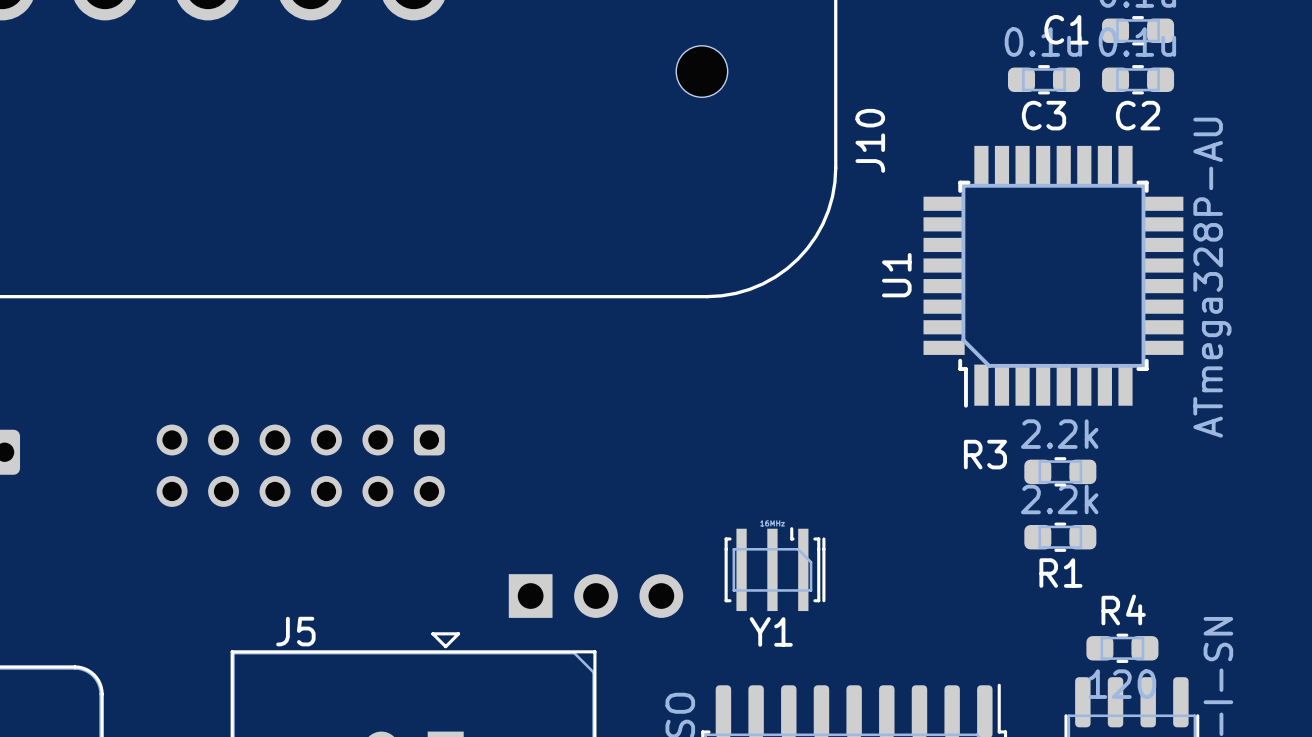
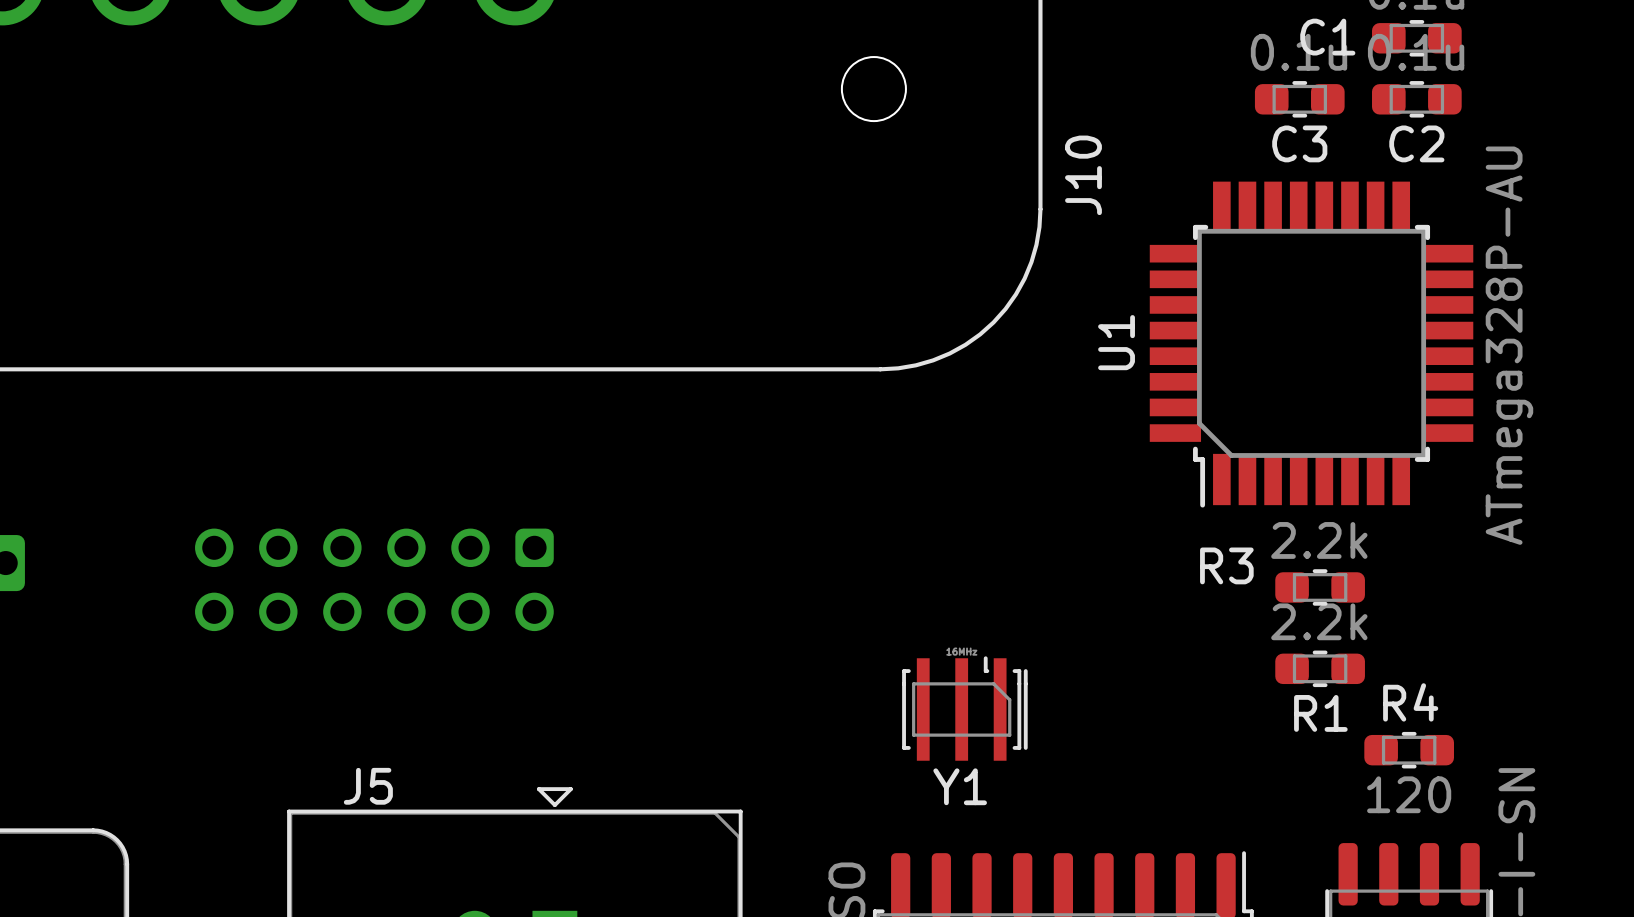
part: (596, 596) -> none
R4 position: (1122, 648) -> (1409, 750)

